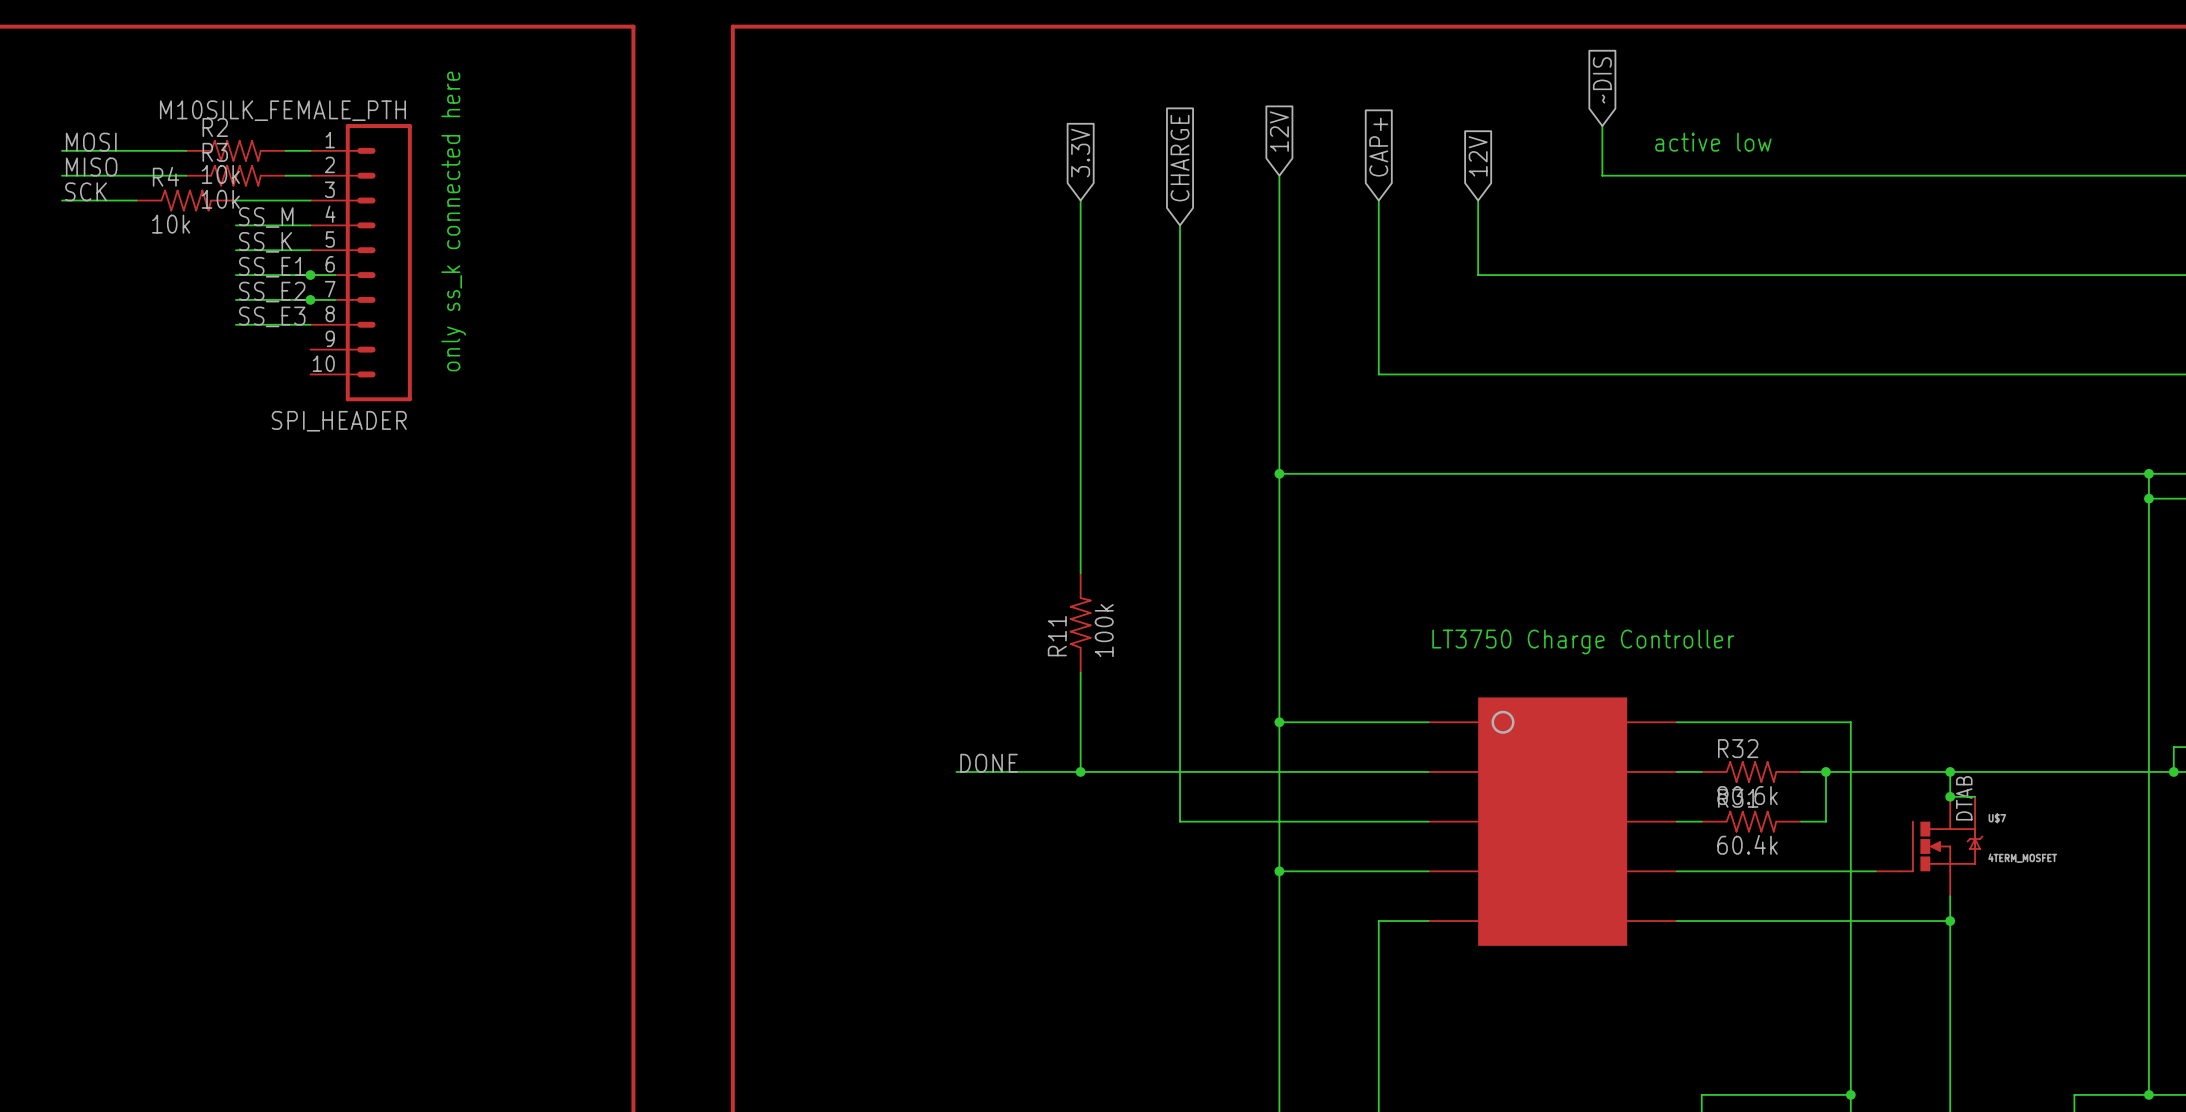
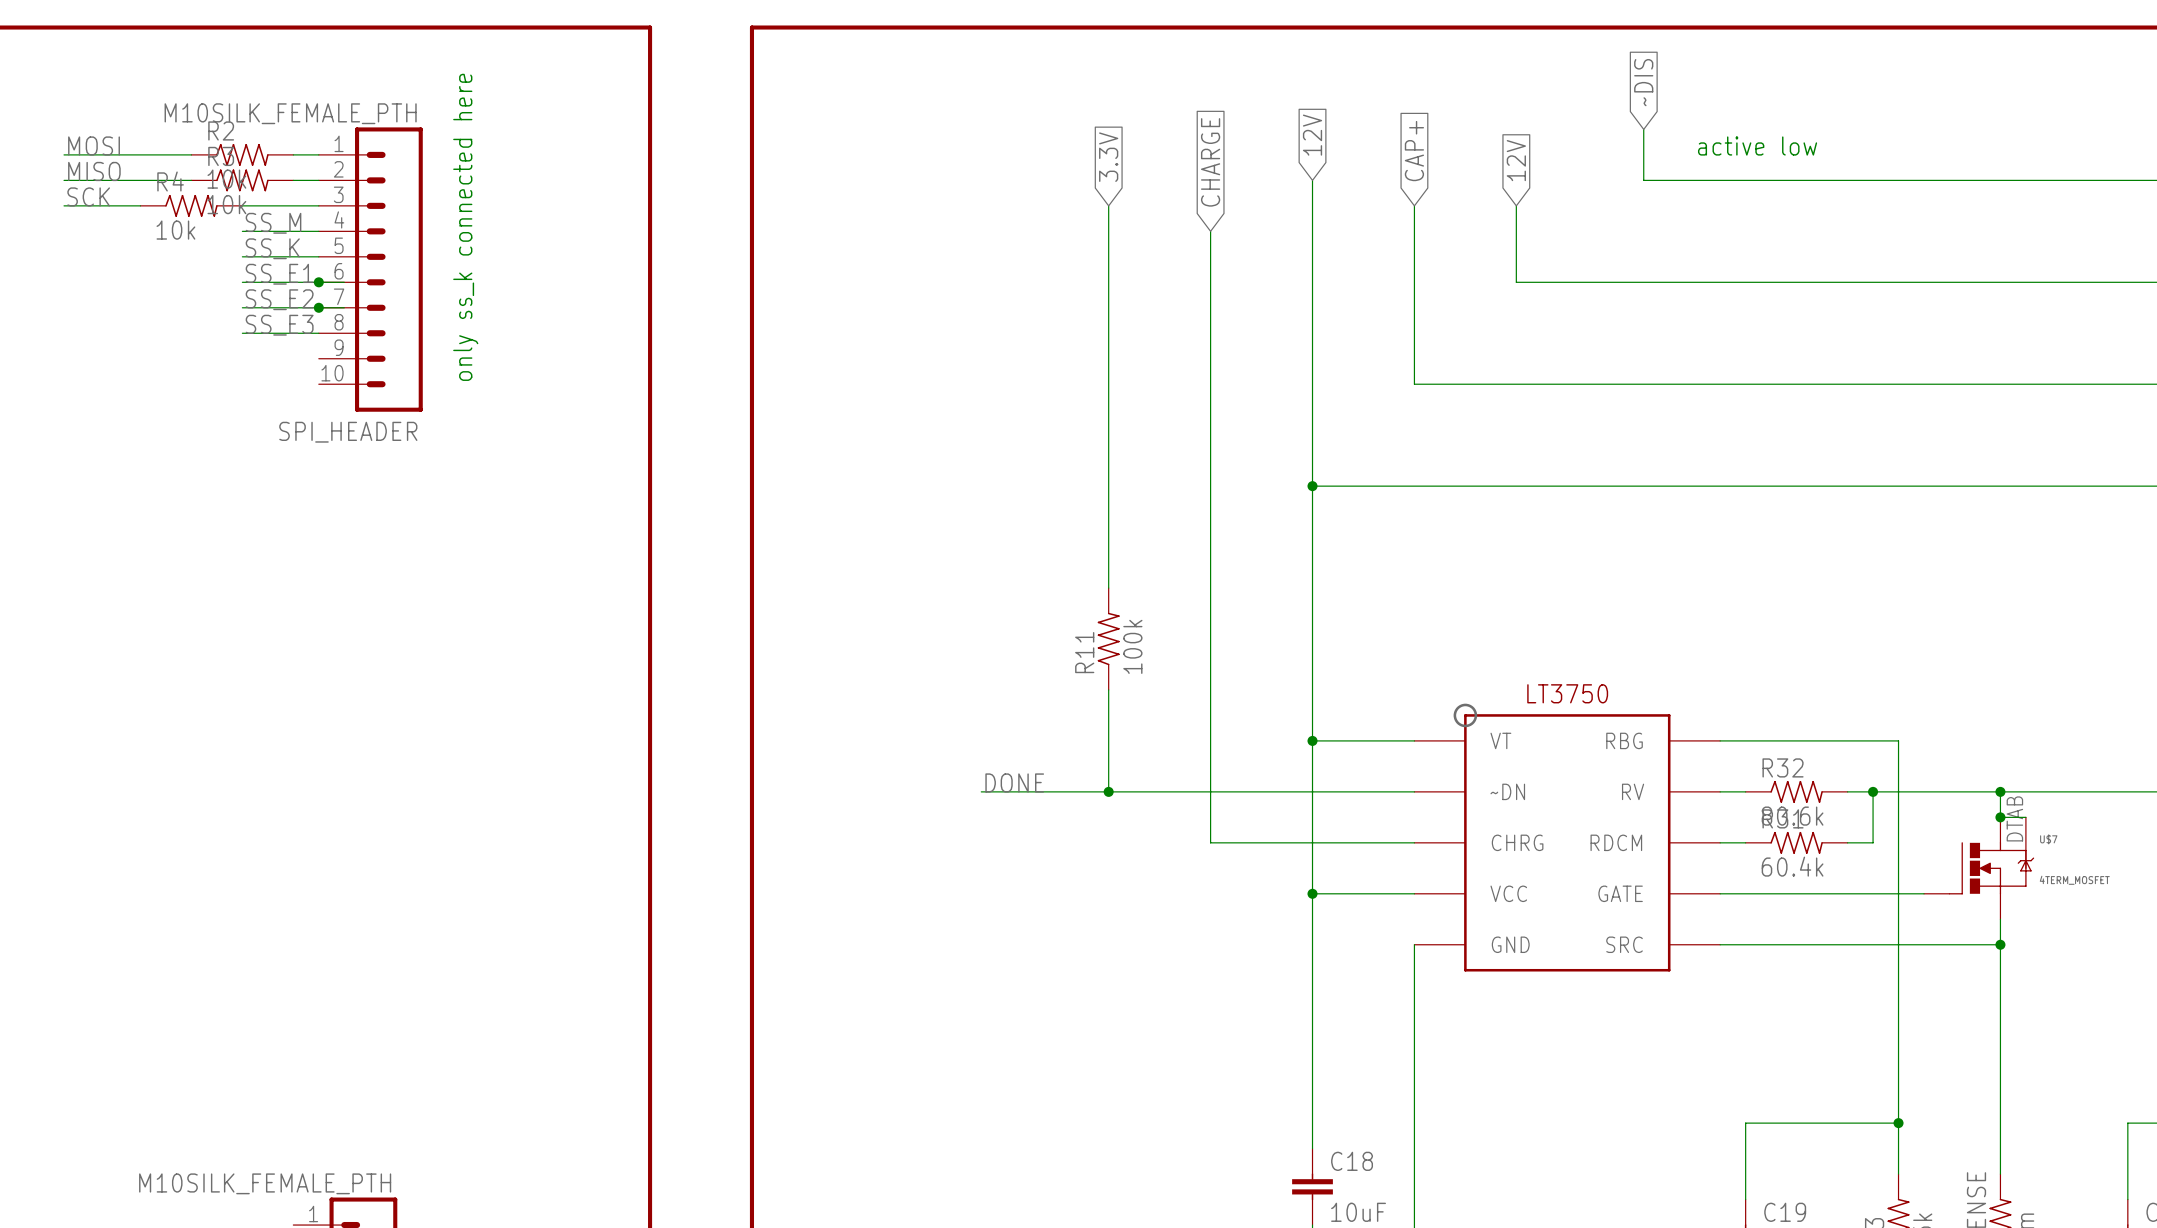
text: LT3750 Charge Controller (1583, 641) -> none
part: none -> (1567, 837)
part: (1552, 821) -> none

